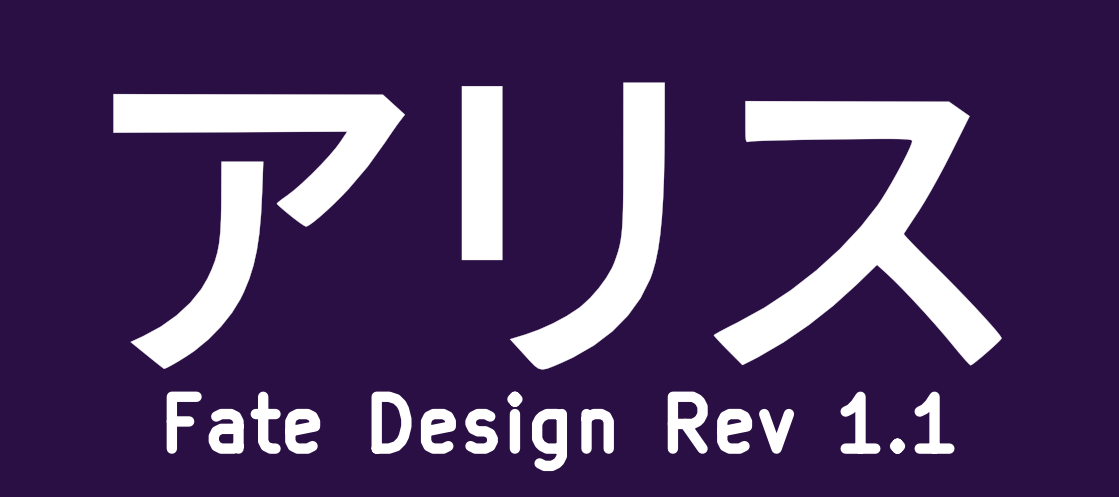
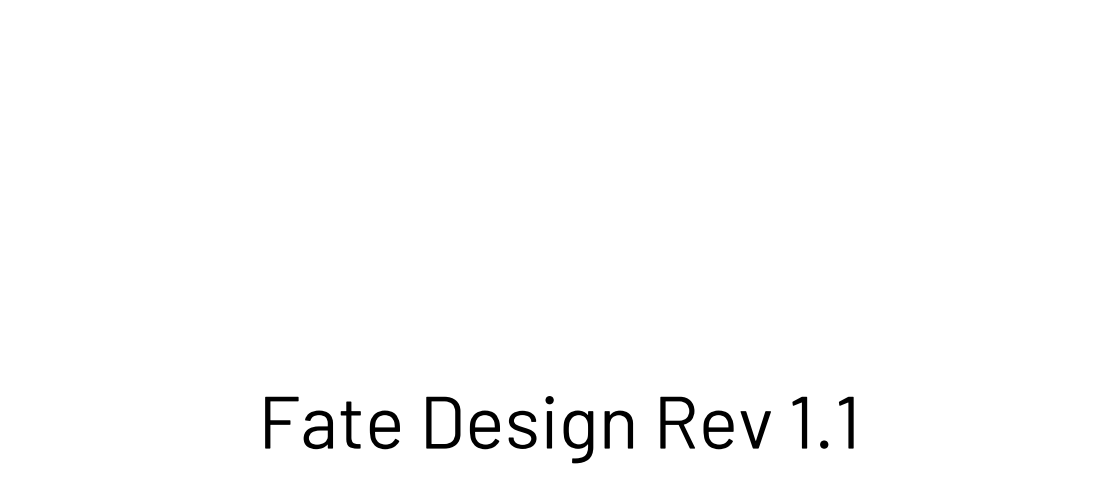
drawing: [113, 82, 1002, 370] -> none

